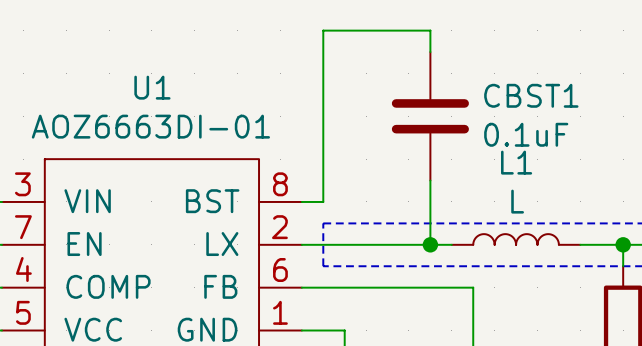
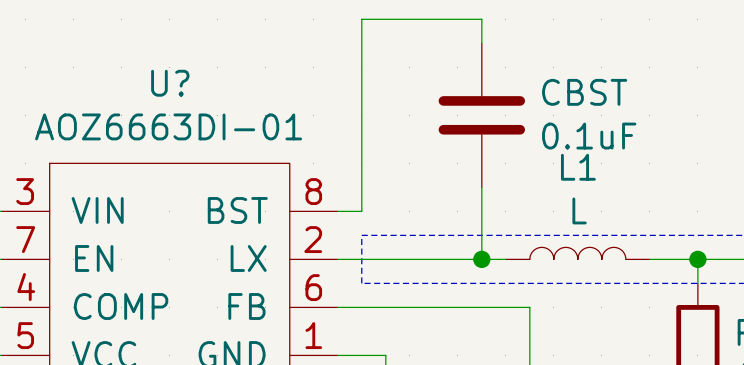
U1 name: U1 (152, 87) -> U? (170, 83)
CBST1 name: CBST1 (531, 95) -> CBST (584, 92)

